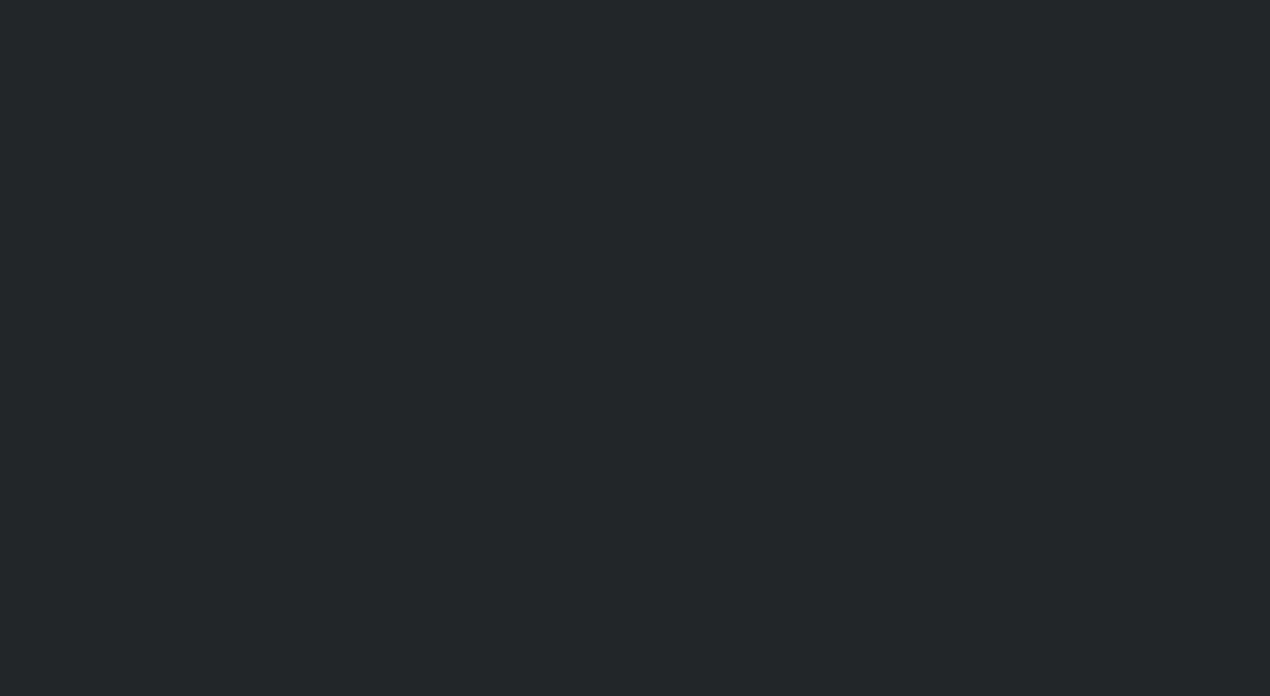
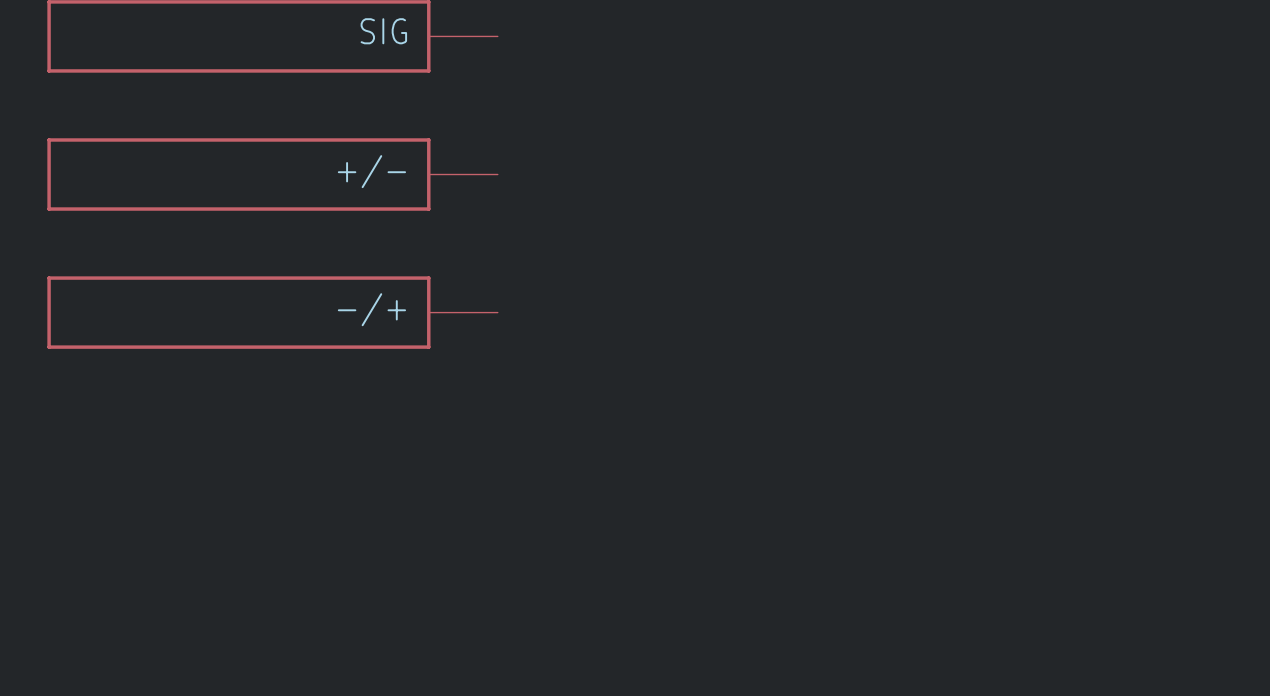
SIG: none -> (272, 36)
part: none -> (272, 174)
part: none -> (272, 312)

